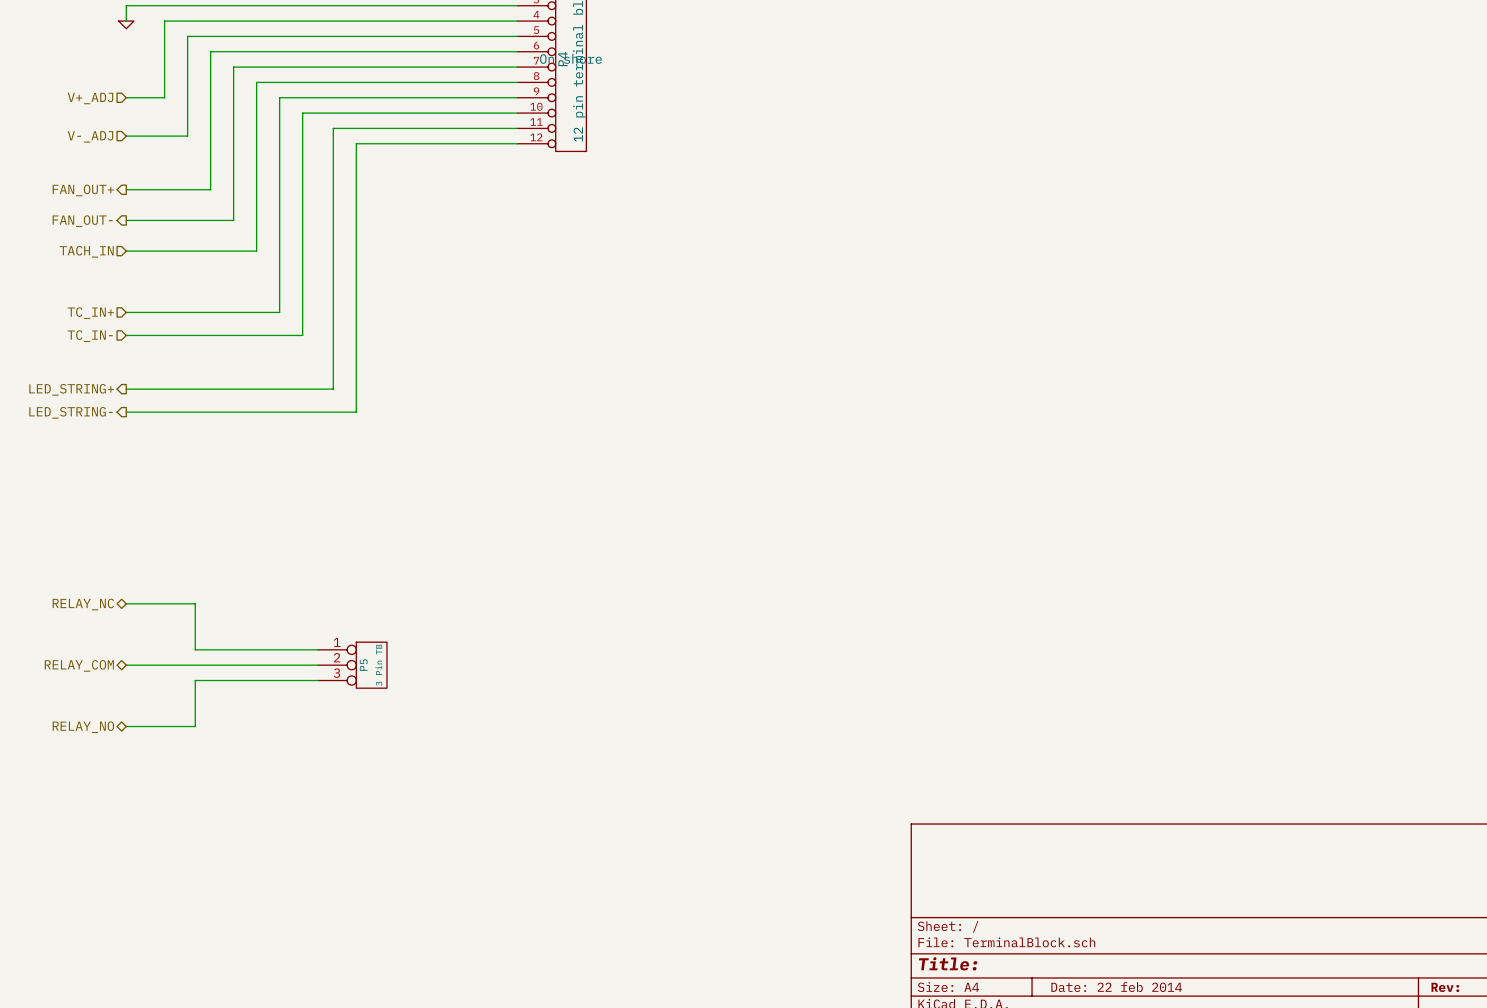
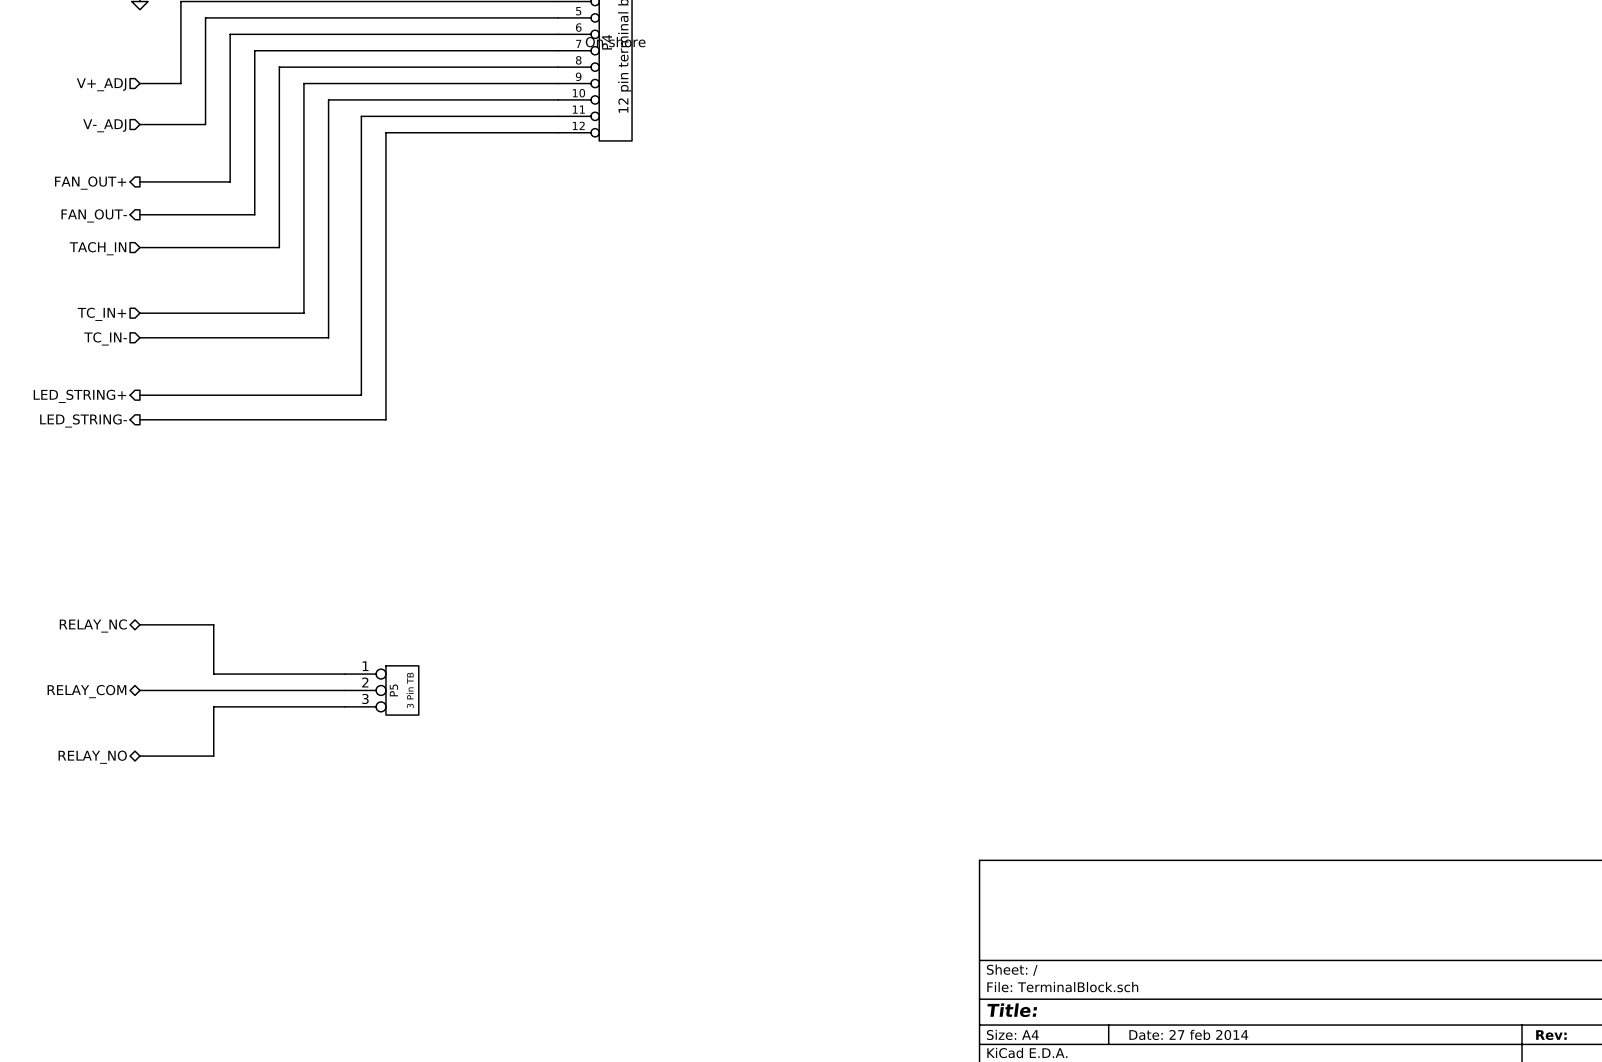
title block: Date: 22 feb 2014 (1116, 987) -> Date: 27 feb 2014 (1188, 1034)

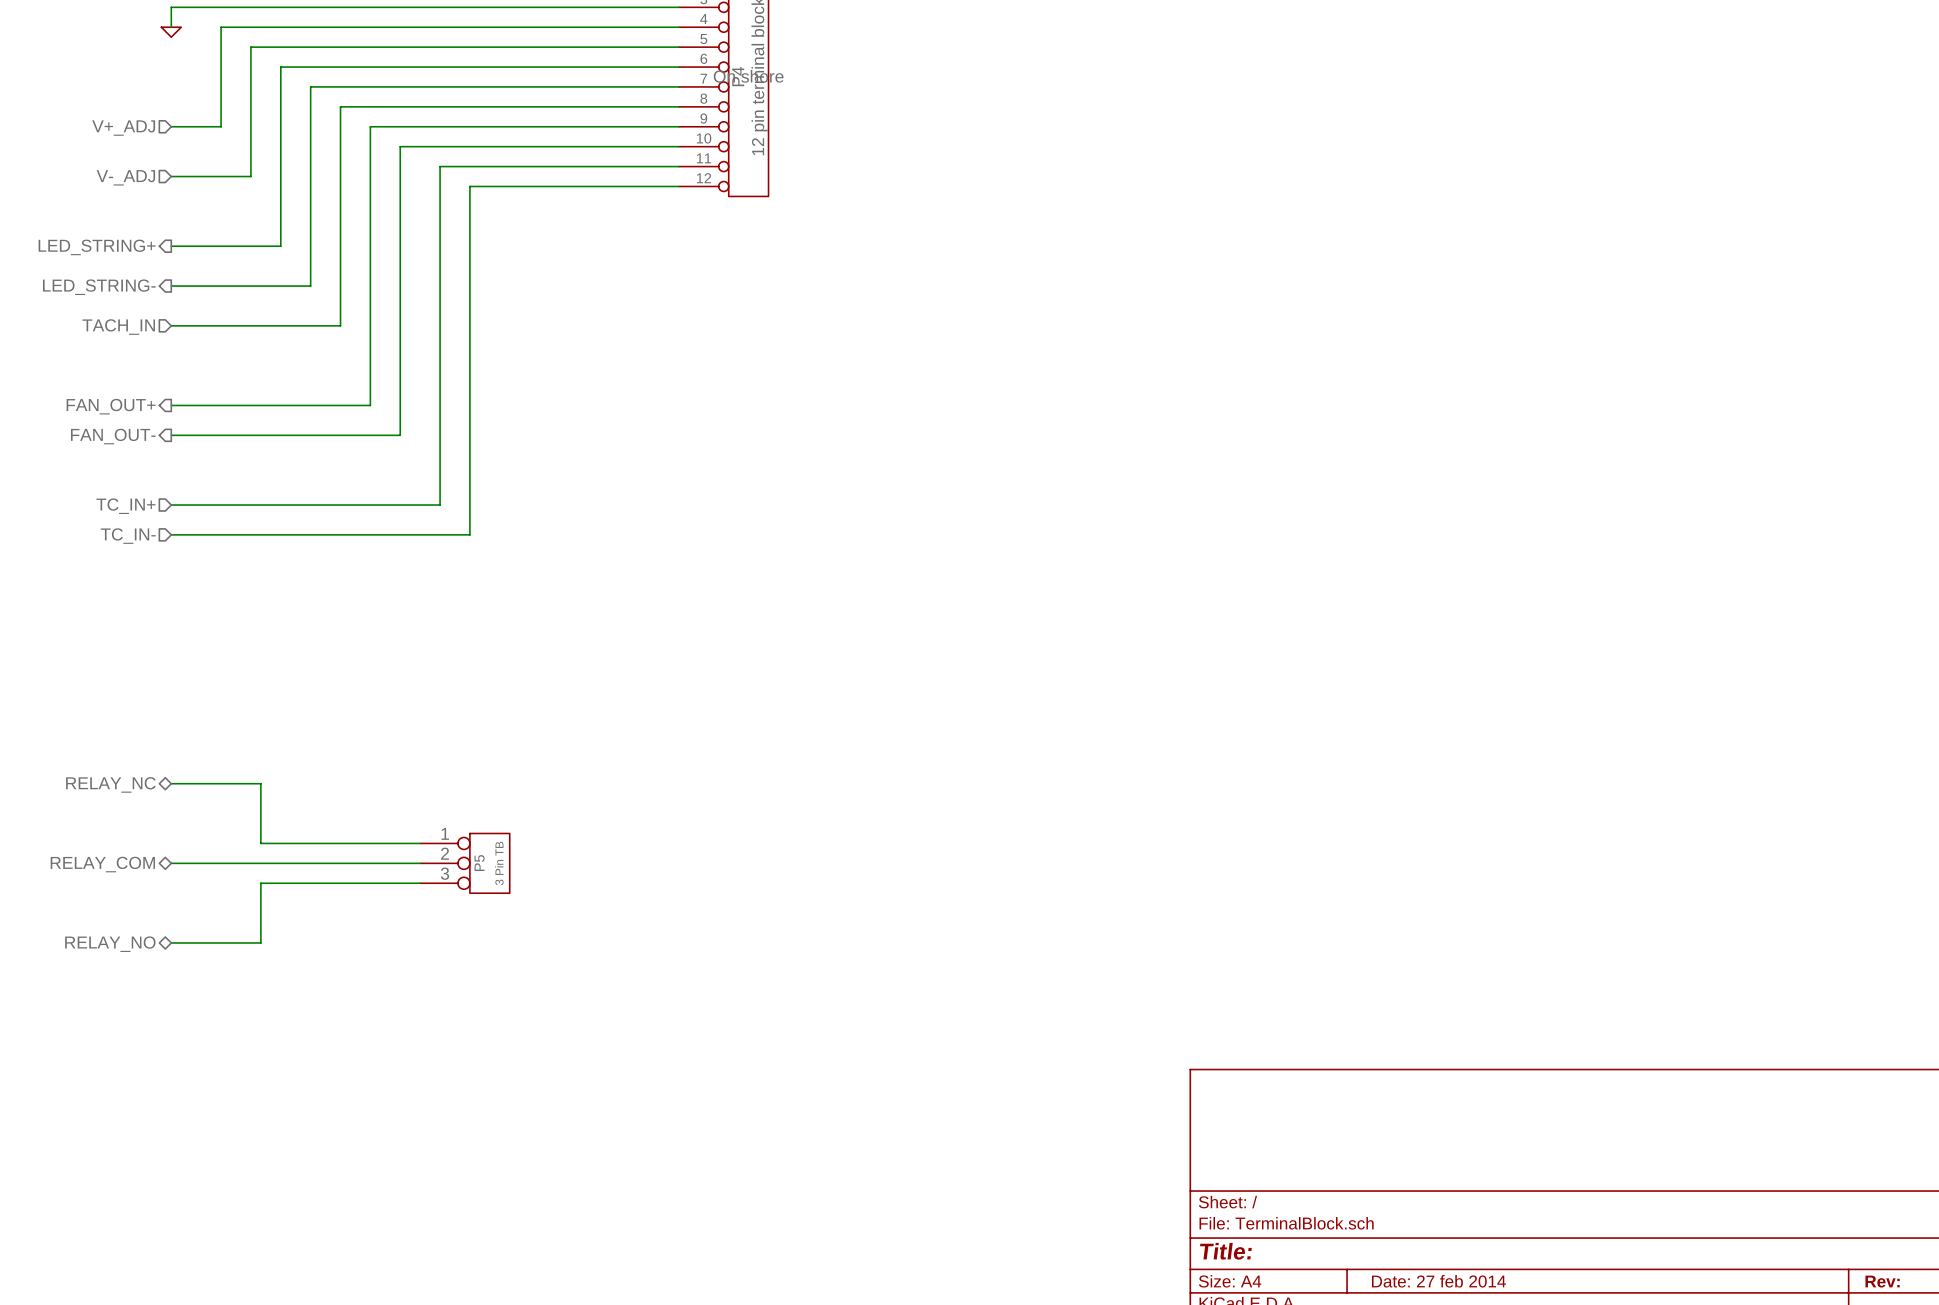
hierarchical label: FAN_OUT+ (90, 183) -> LED_STRING+ (97, 247)
hierarchical label: FAN_OUT- (94, 215) -> LED_STRING- (99, 287)
hierarchical label shape: input (101, 314) -> output (111, 406)
hierarchical label: TC_IN+ (101, 314) -> FAN_OUT+ (111, 406)
hierarchical label shape: input (105, 338) -> output (113, 436)
hierarchical label: TC_IN- (105, 338) -> FAN_OUT- (113, 436)
hierarchical label shape: output (79, 396) -> input (125, 506)
hierarchical label: LED_STRING+ (79, 396) -> TC_IN+ (125, 506)
hierarchical label shape: output (83, 420) -> input (128, 536)
hierarchical label: LED_STRING- (83, 420) -> TC_IN- (128, 536)

